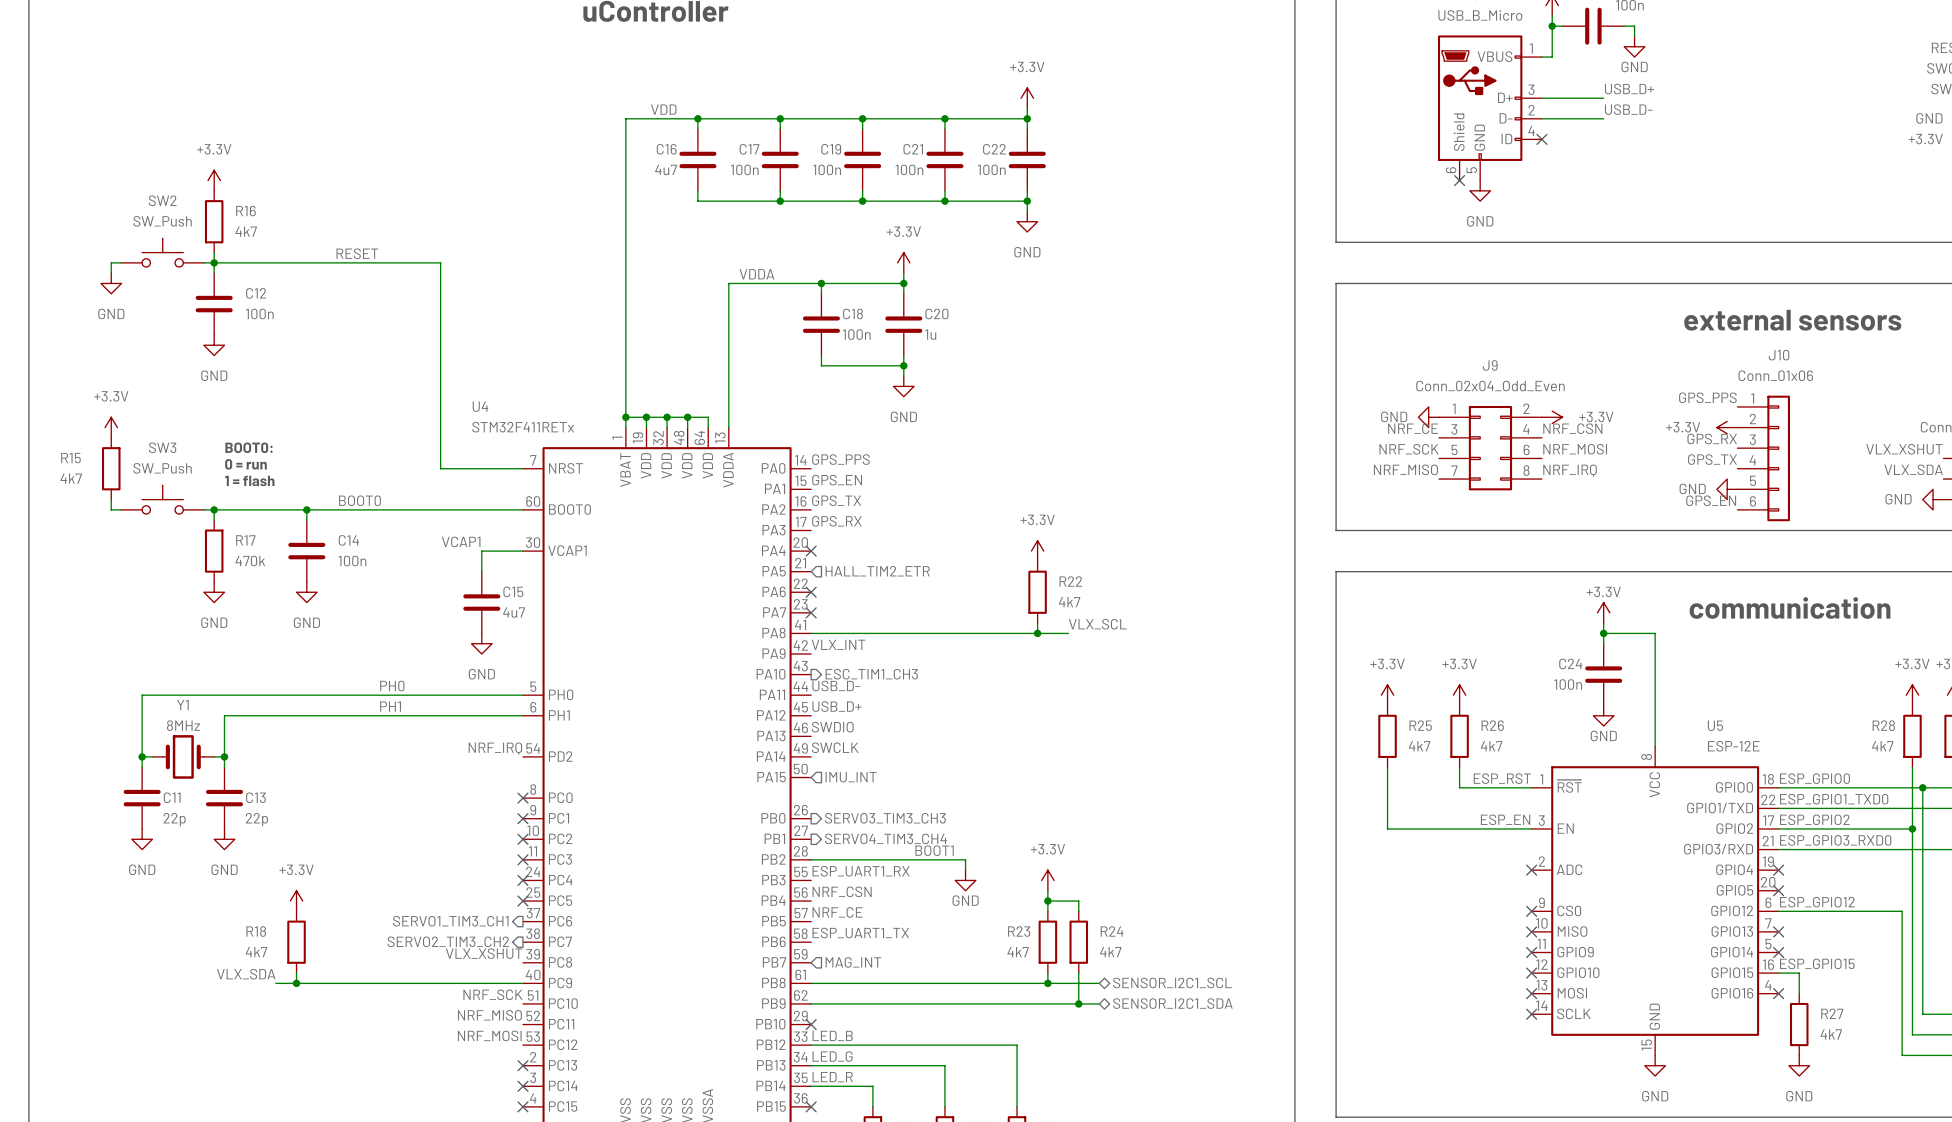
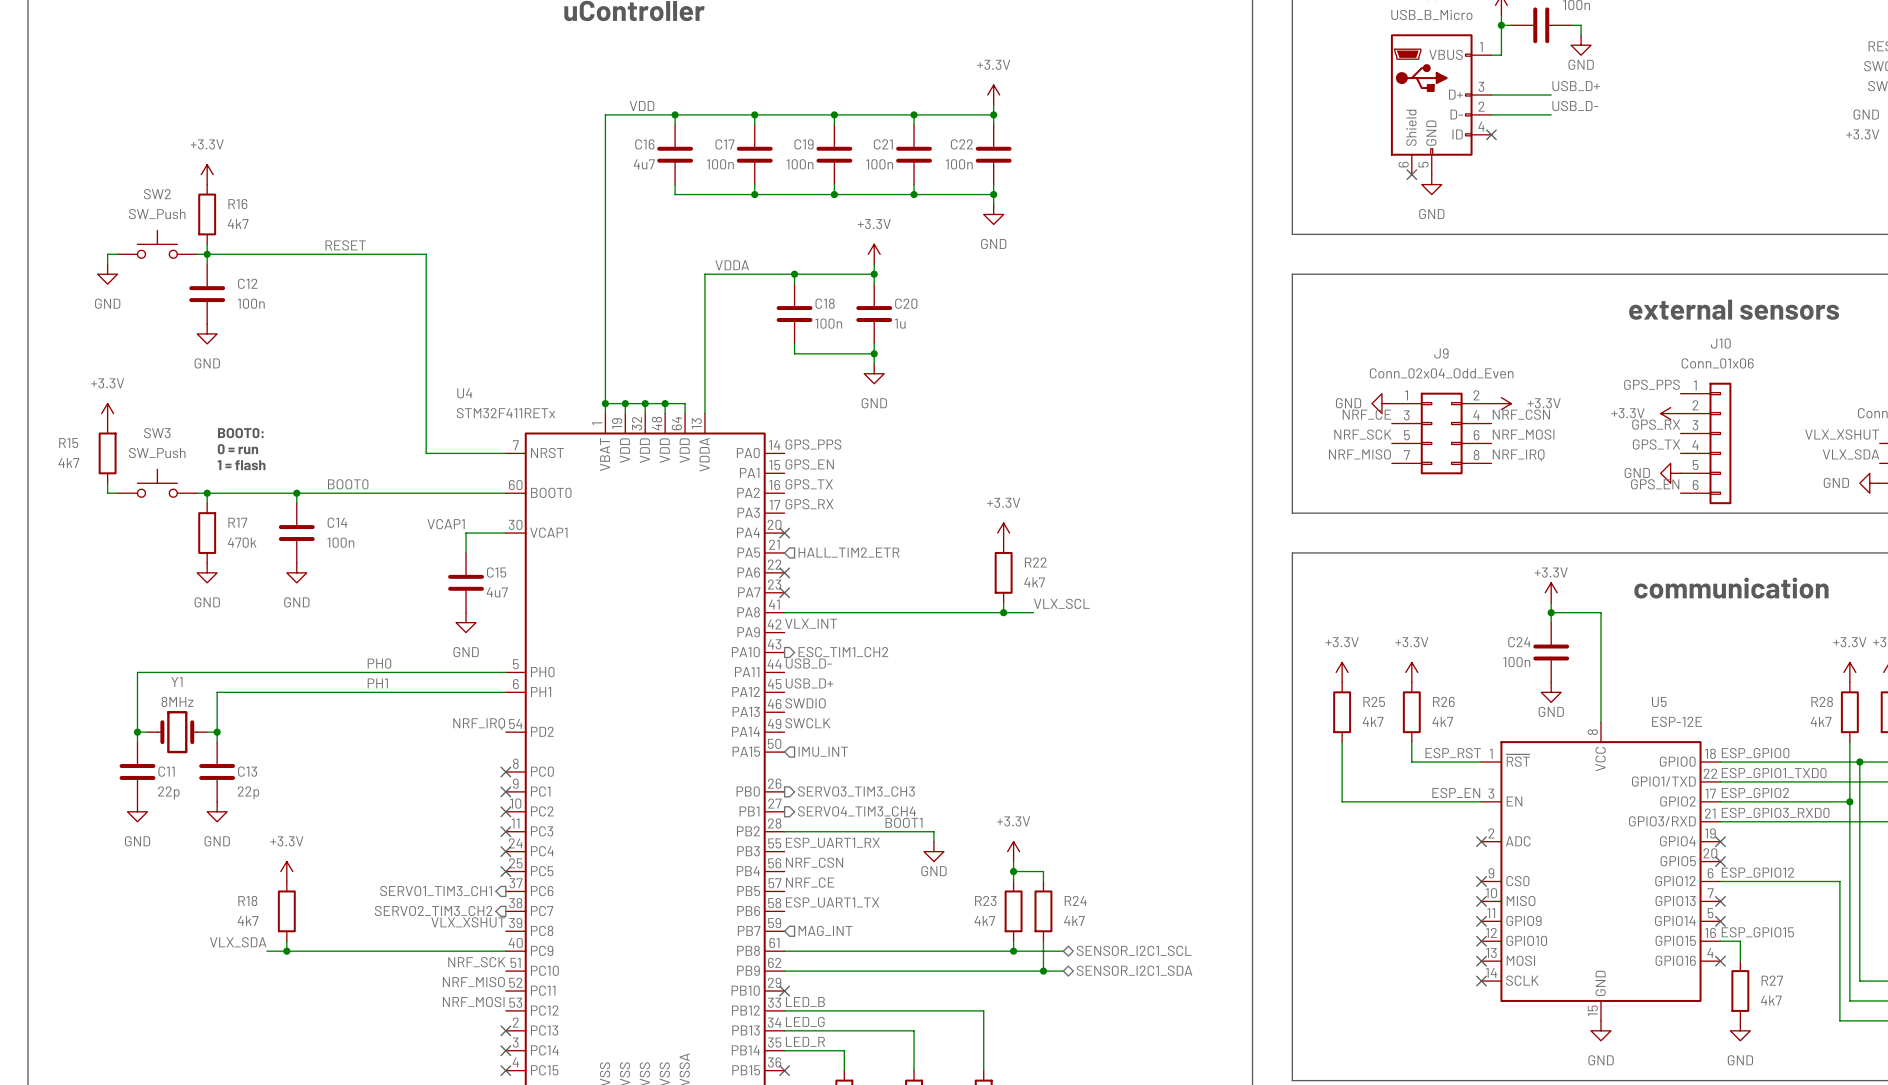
hierarchical label: ESC_TIM1_CH3 (871, 674) -> ESC_TIM1_CH2 (843, 652)

